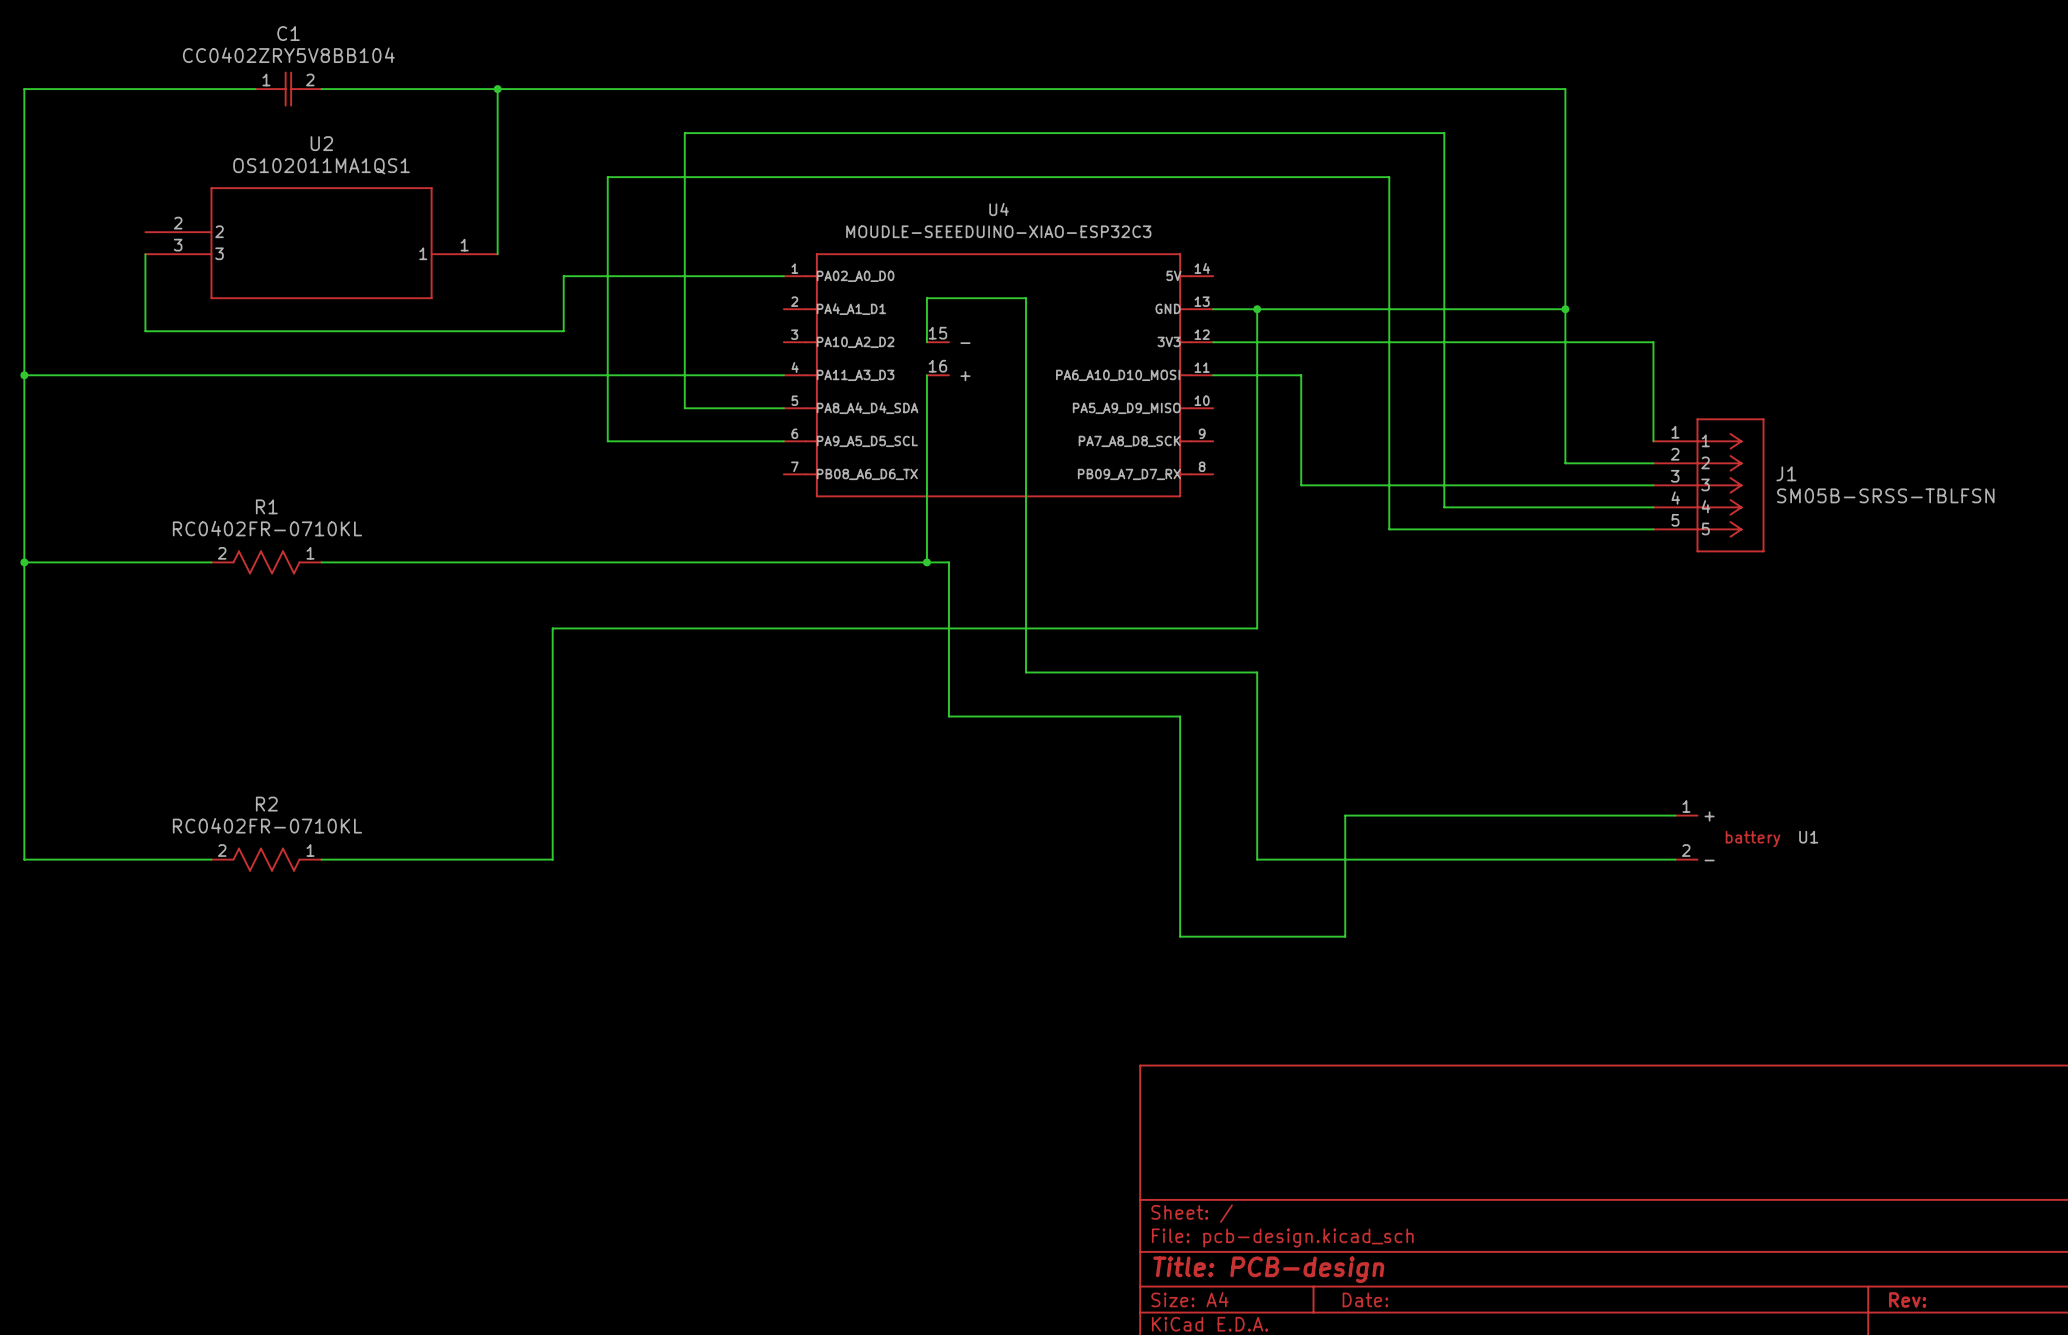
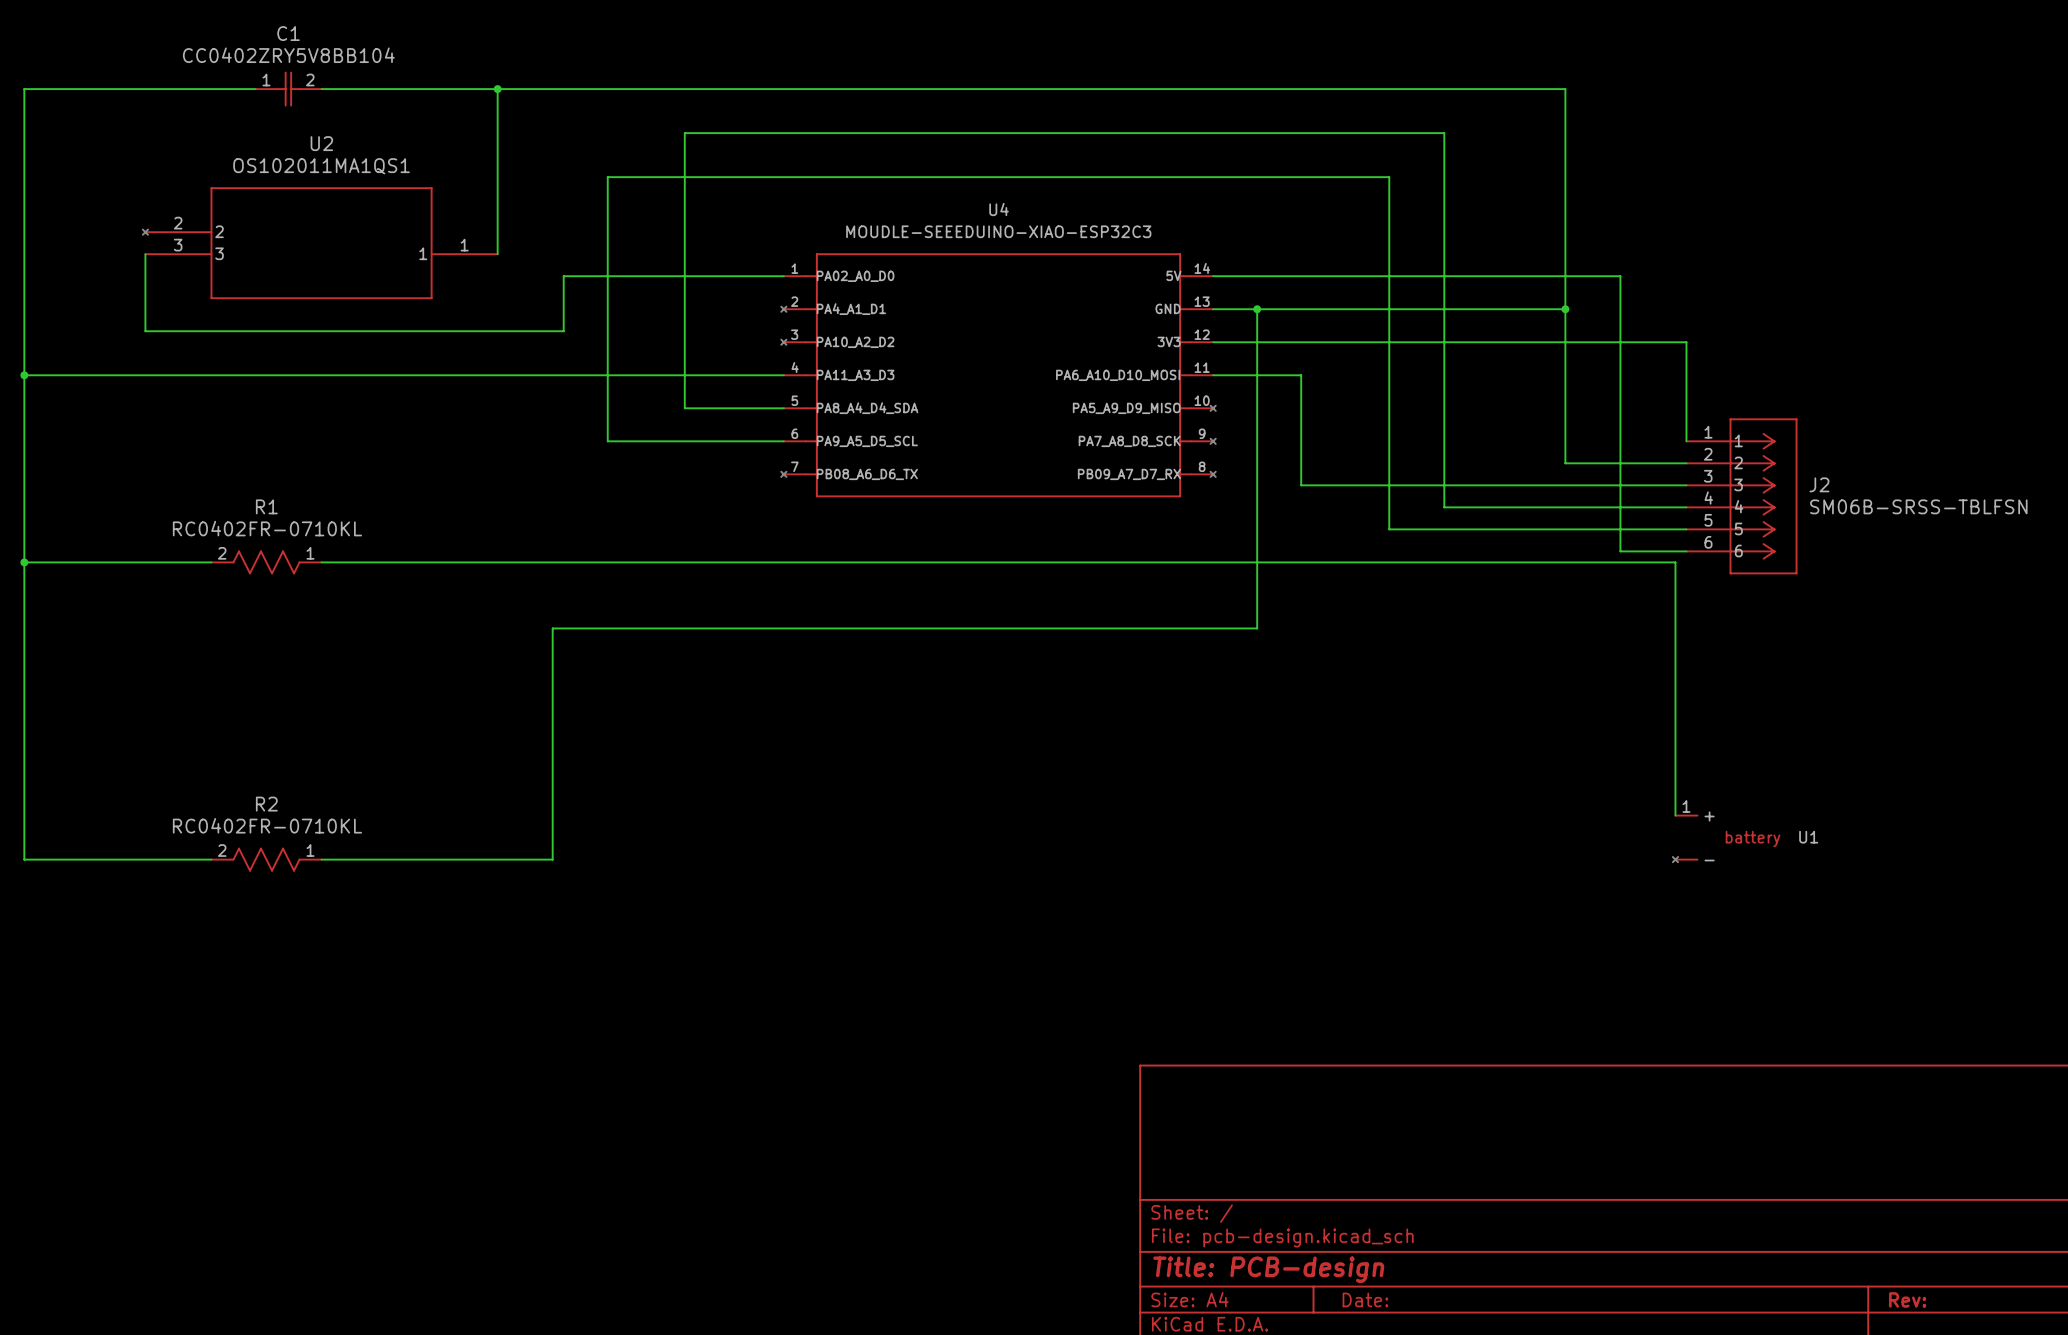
U2 symbol: [145, 187, 498, 299] -> [142, 187, 498, 299]
U4 symbol: [783, 253, 1214, 498] -> [781, 253, 1216, 498]
wire: none -> (1213, 276) (1620, 276) (1620, 551) (1686, 551)
wire: (926, 342) (926, 298) (1026, 298) (1026, 672) (1257, 672) (1257, 859) (1675, 859) -> none
wire: (1653, 342) (1653, 441) -> (1653, 342) (1686, 342) (1686, 441)
wire: (926, 375) (926, 562) -> none
J1: SM05B-SRSS-TBLFSN (1708, 485) -> none
J2: none -> SM06B-SRSS-TBLFSN (1741, 496)
junction: (926, 562) -> none
wire: (948, 562) (948, 716) (1180, 716) (1180, 936) (1345, 936) (1345, 815) (1675, 815) -> (948, 562) (1675, 562) (1675, 815)
U1 symbol: [1675, 815, 1698, 860] -> [1672, 815, 1698, 863]

